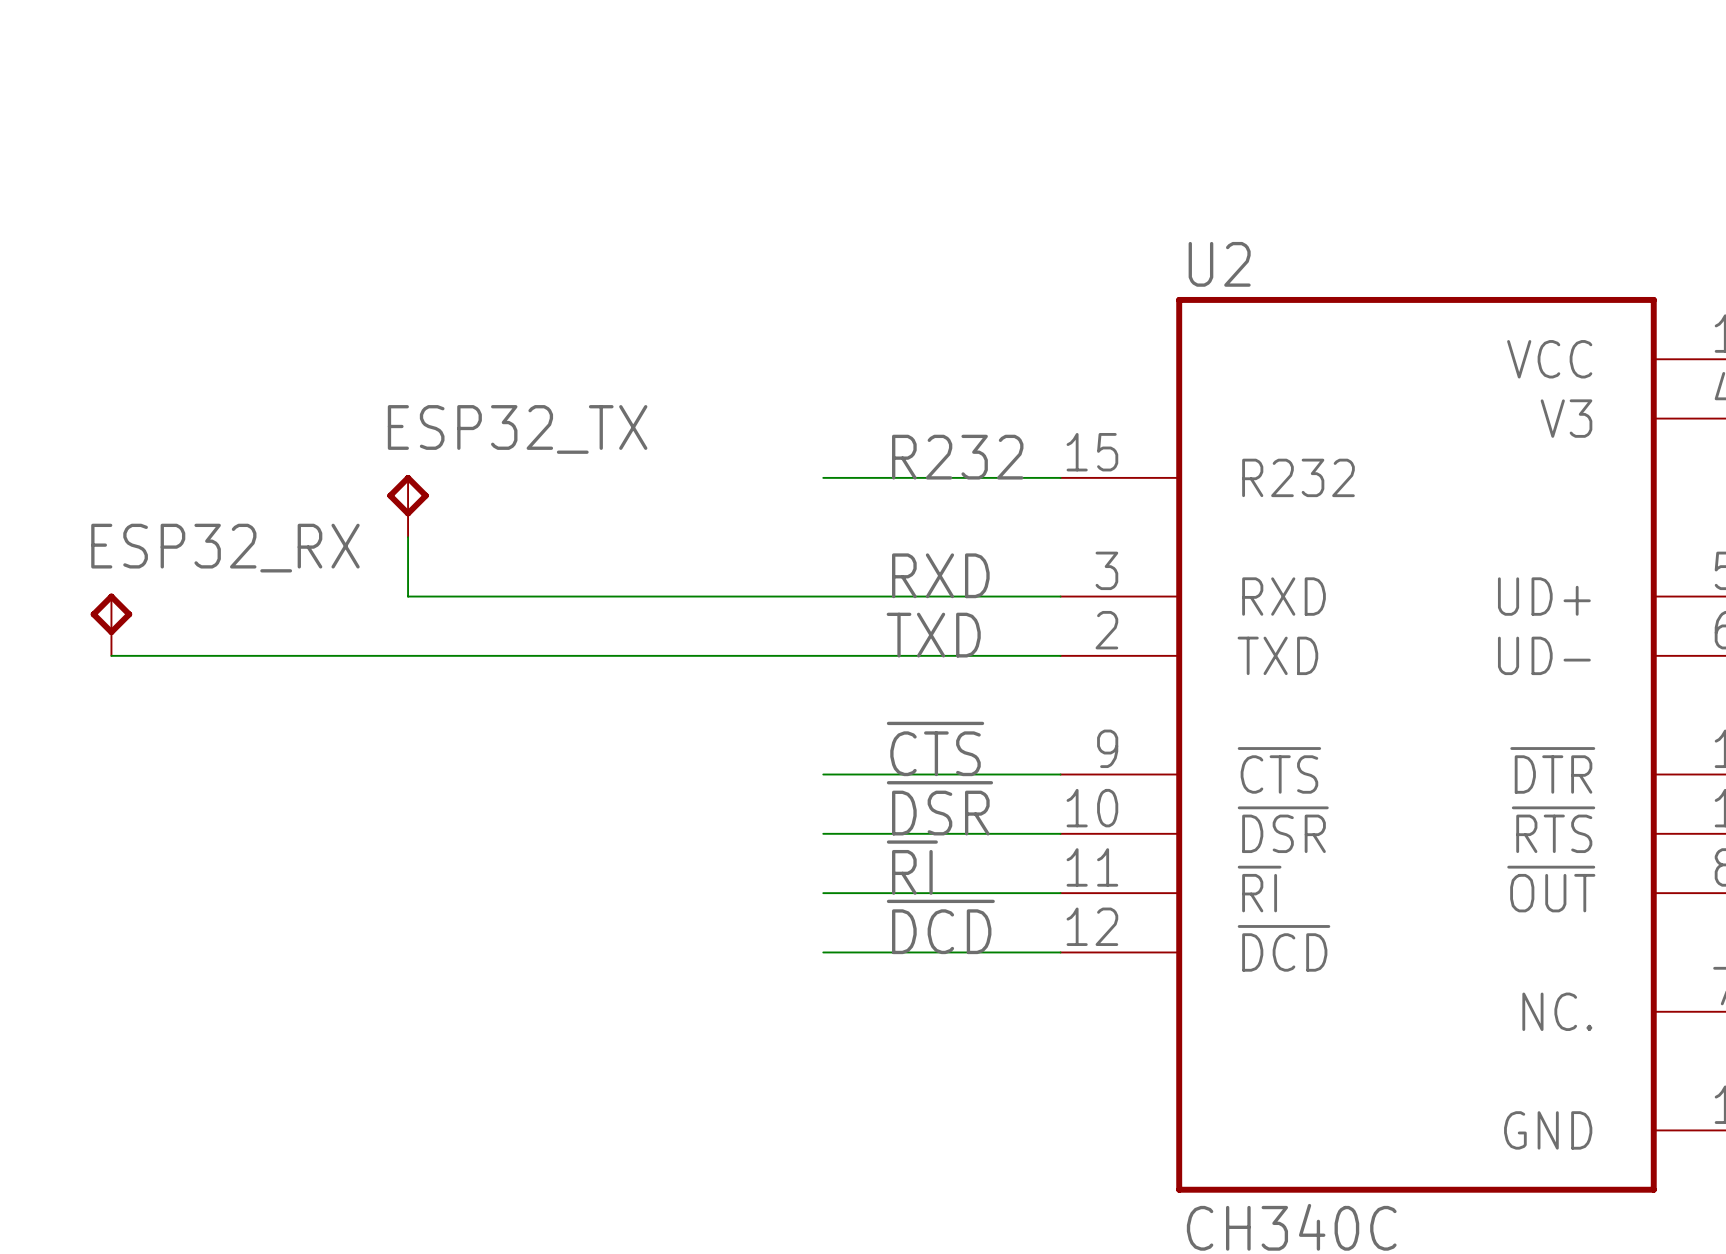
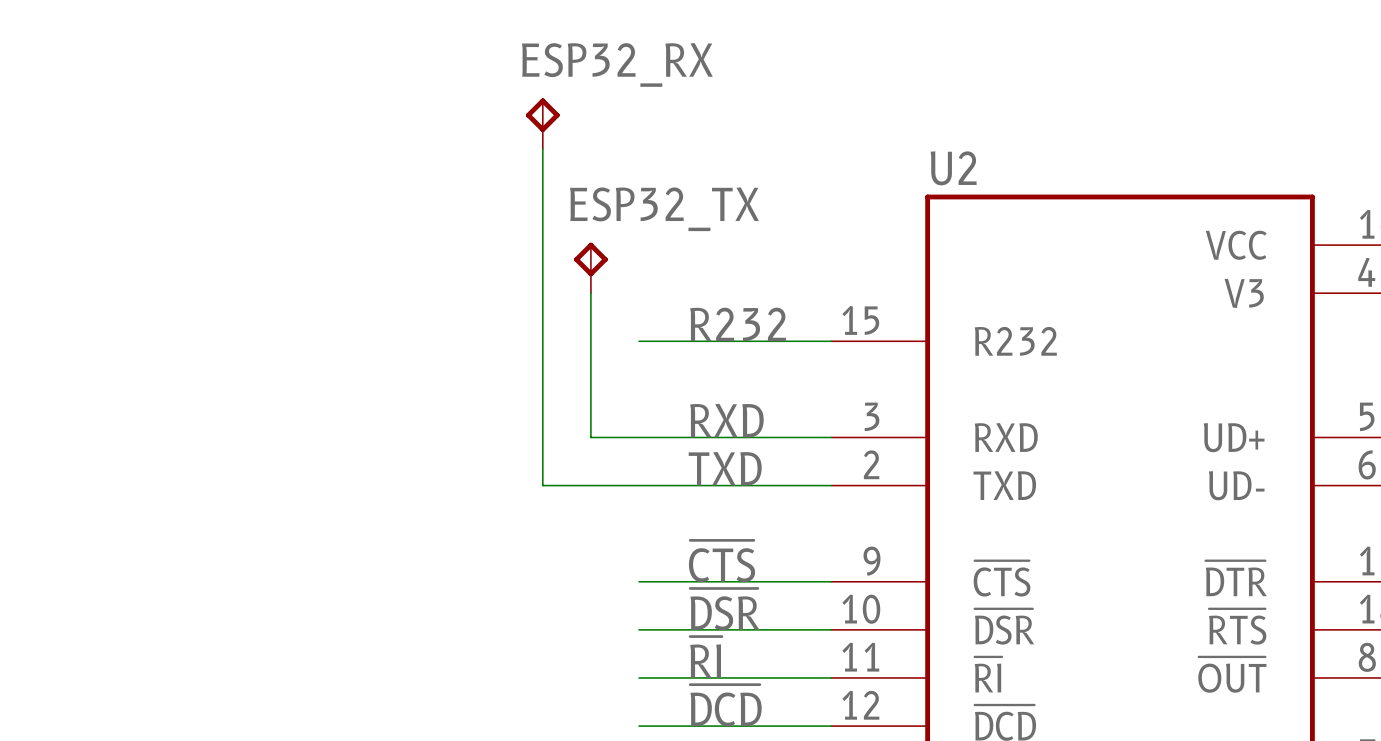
ESP32_TX position: (408, 506) -> (590, 267)
wire: (408, 537) (408, 596) (763, 596) -> (590, 293) (590, 437)
ESP32_RX position: (111, 624) -> (542, 123)
wire: (111, 655) (704, 655) -> (542, 148) (542, 485)

